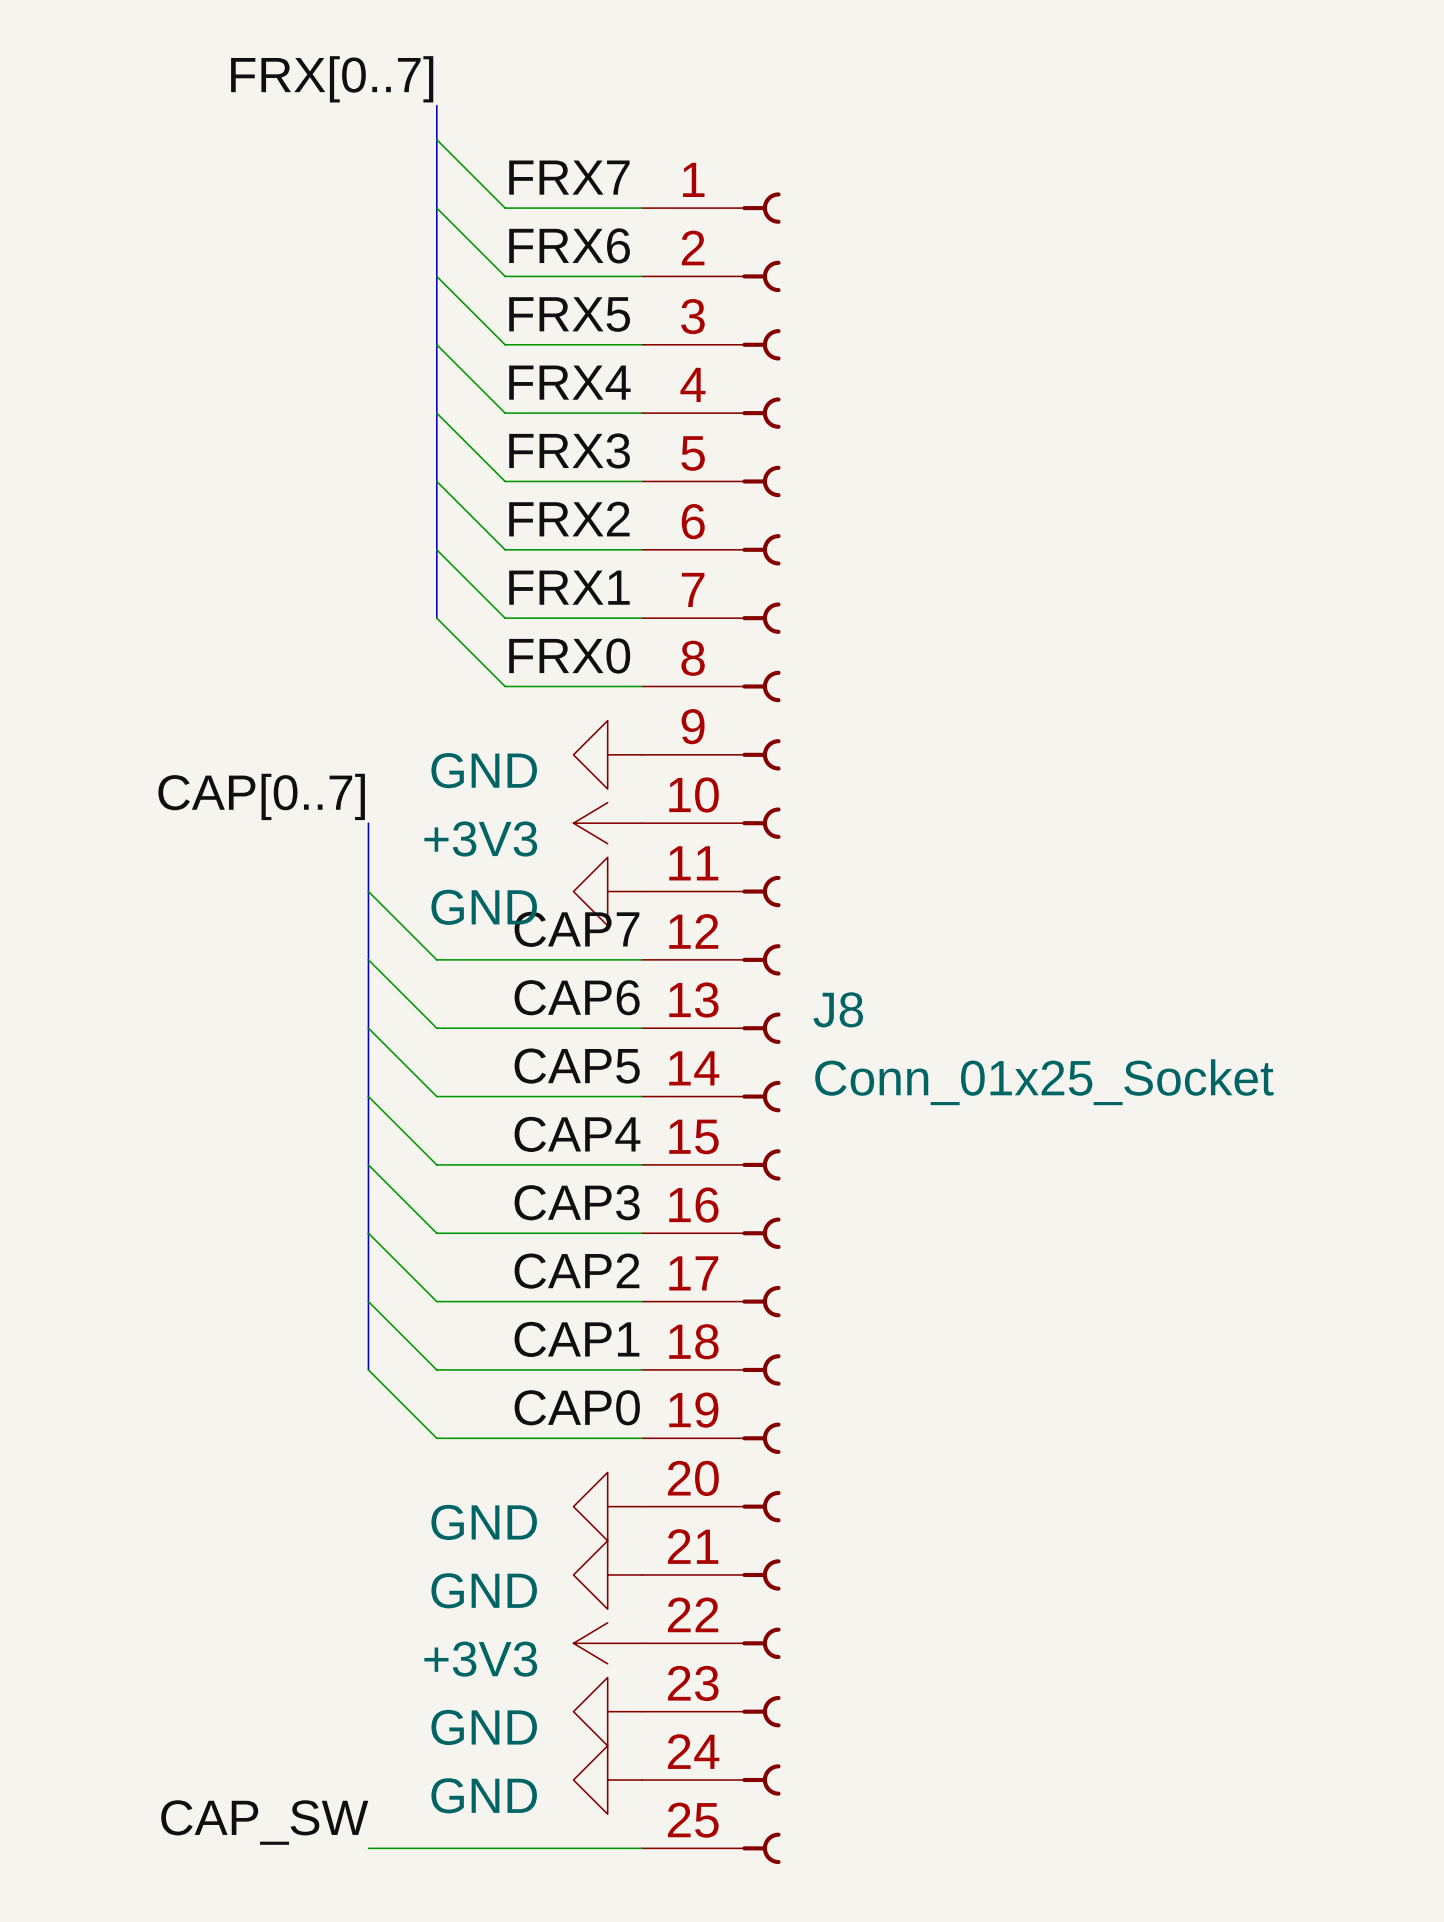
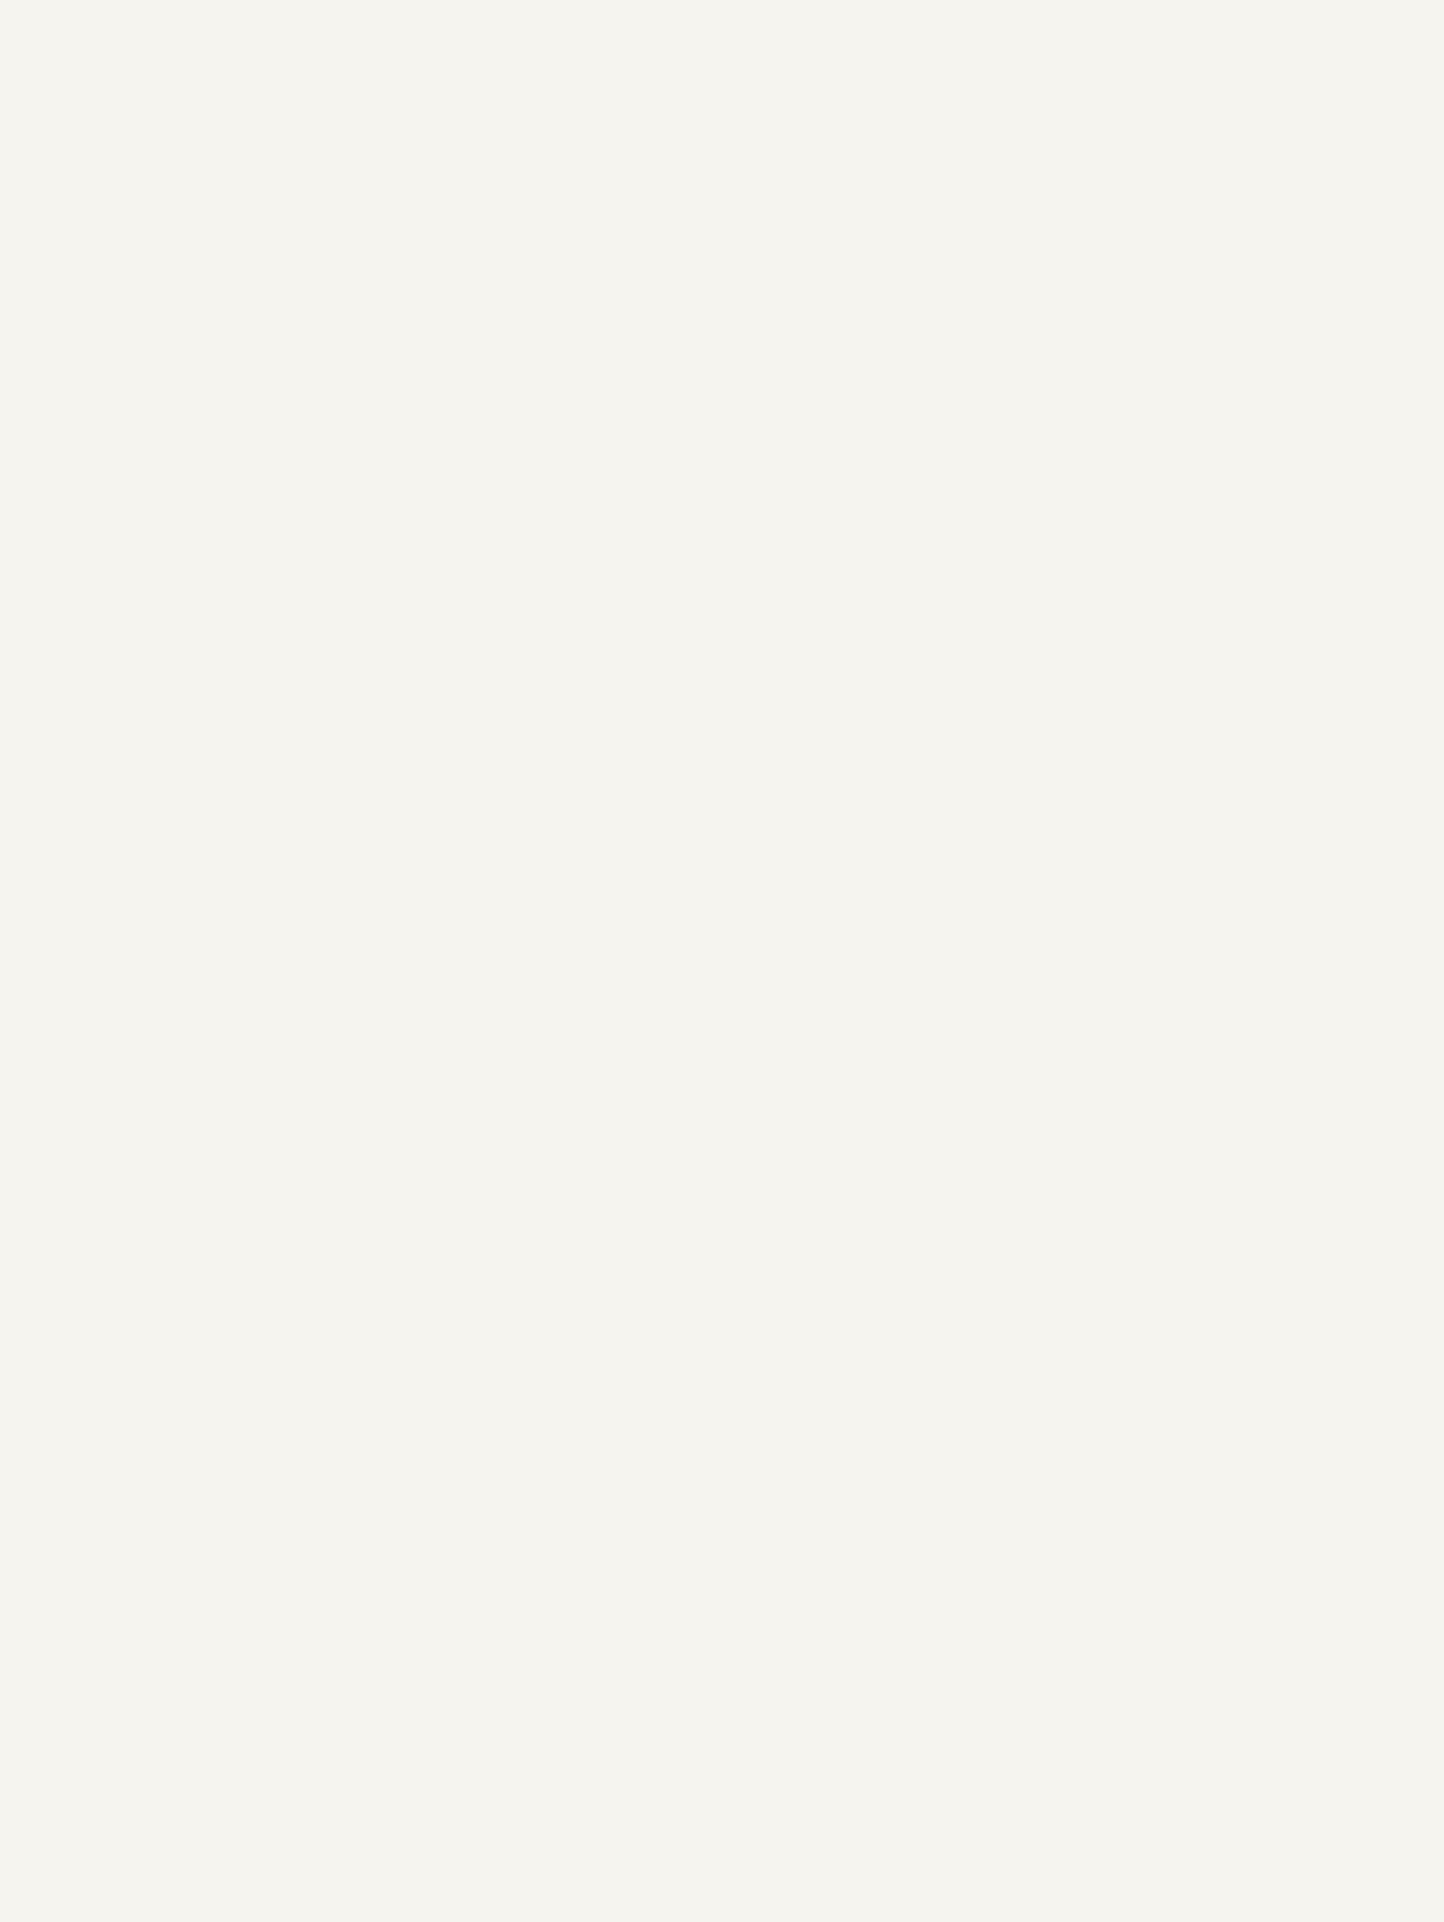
label: FRX[0..7] (332, 79) -> none
bus: (436, 105) (436, 618) -> none
wire: (436, 139) (505, 208) (641, 208) -> none
label: FRX7 (569, 177) -> none
wire: (436, 208) (505, 276) (641, 276) -> none
label: FRX6 (569, 245) -> none
wire: (436, 276) (505, 344) (641, 344) -> none
label: FRX5 (569, 314) -> none
wire: (436, 344) (505, 413) (641, 413) -> none
label: FRX4 (569, 382) -> none
wire: (436, 413) (505, 481) (641, 481) -> none
label: FRX3 (569, 450) -> none
wire: (436, 481) (505, 549) (641, 549) -> none
label: FRX2 (569, 519) -> none
wire: (436, 549) (505, 618) (641, 618) -> none
label: FRX1 (569, 587) -> none
wire: (436, 618) (505, 686) (641, 686) -> none
label: FRX0 (569, 655) -> none
power symbol: GND (607, 754) -> none
label: CAP[0..7] (261, 796) -> none
bus: (368, 823) (368, 1369) -> none
power symbol: +3V3 (607, 823) -> none
wire: (368, 891) (436, 959) (641, 959) -> none
power symbol: GND (607, 891) -> none
label: CAP7 (576, 929) -> none
wire: (368, 959) (436, 1028) (641, 1028) -> none
label: CAP6 (577, 997) -> none
wire: (368, 1028) (436, 1096) (641, 1096) -> none
J8: Conn_01x25_Socket (711, 1028) -> none
label: CAP5 (577, 1066) -> none
wire: (368, 1096) (436, 1164) (641, 1164) -> none
label: CAP4 (577, 1134) -> none
wire: (368, 1164) (436, 1233) (641, 1233) -> none
label: CAP3 (577, 1202) -> none
wire: (368, 1233) (436, 1301) (641, 1301) -> none
label: CAP2 (576, 1271) -> none
wire: (368, 1301) (436, 1369) (641, 1369) -> none
label: CAP1 (577, 1339) -> none
wire: (368, 1369) (436, 1438) (641, 1438) -> none
label: CAP0 (577, 1407) -> none
power symbol: GND (607, 1506) -> none
power symbol: GND (607, 1574) -> none
power symbol: +3V3 (607, 1643) -> none
power symbol: GND (607, 1711) -> none
power symbol: GND (607, 1780) -> none
label: CAP_SW (264, 1822) -> none
wire: (368, 1848) (641, 1848) -> none

